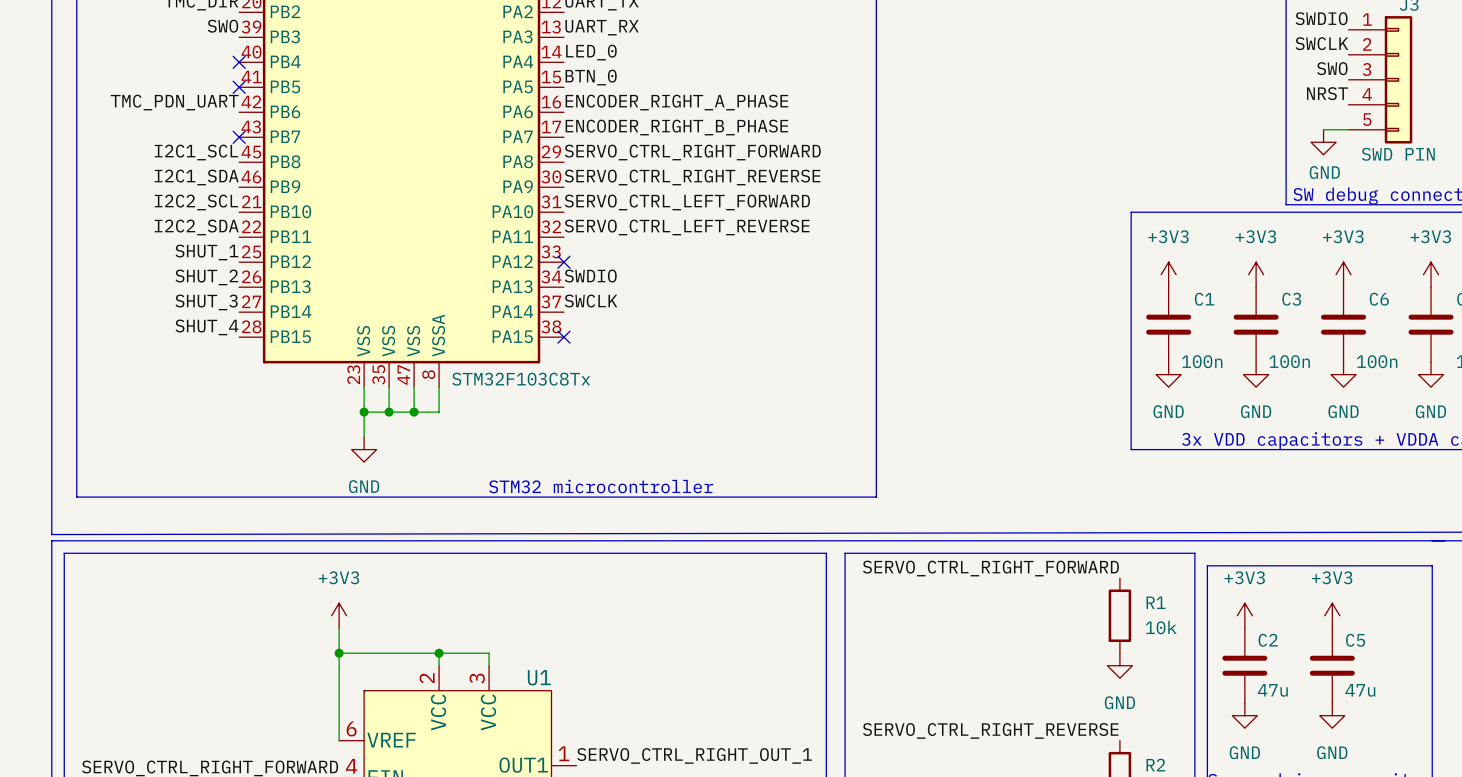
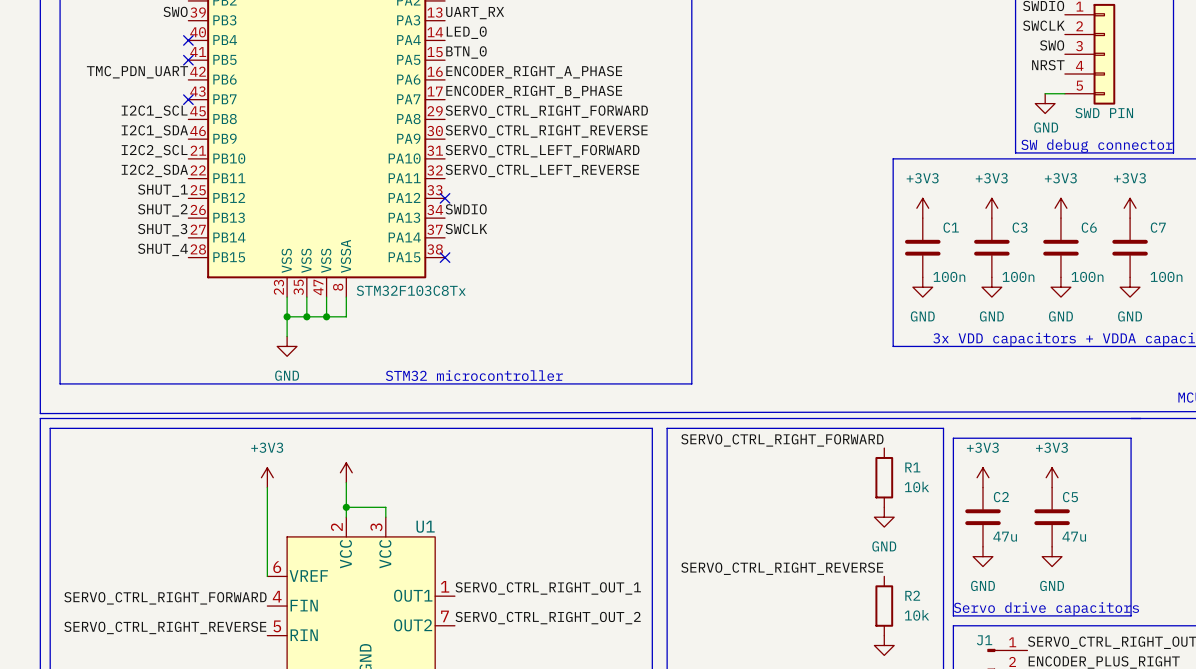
power symbol: none -> (346, 472)
wire: (339, 653) (439, 653) -> (346, 482) (346, 507)
junction: (339, 653) -> none

